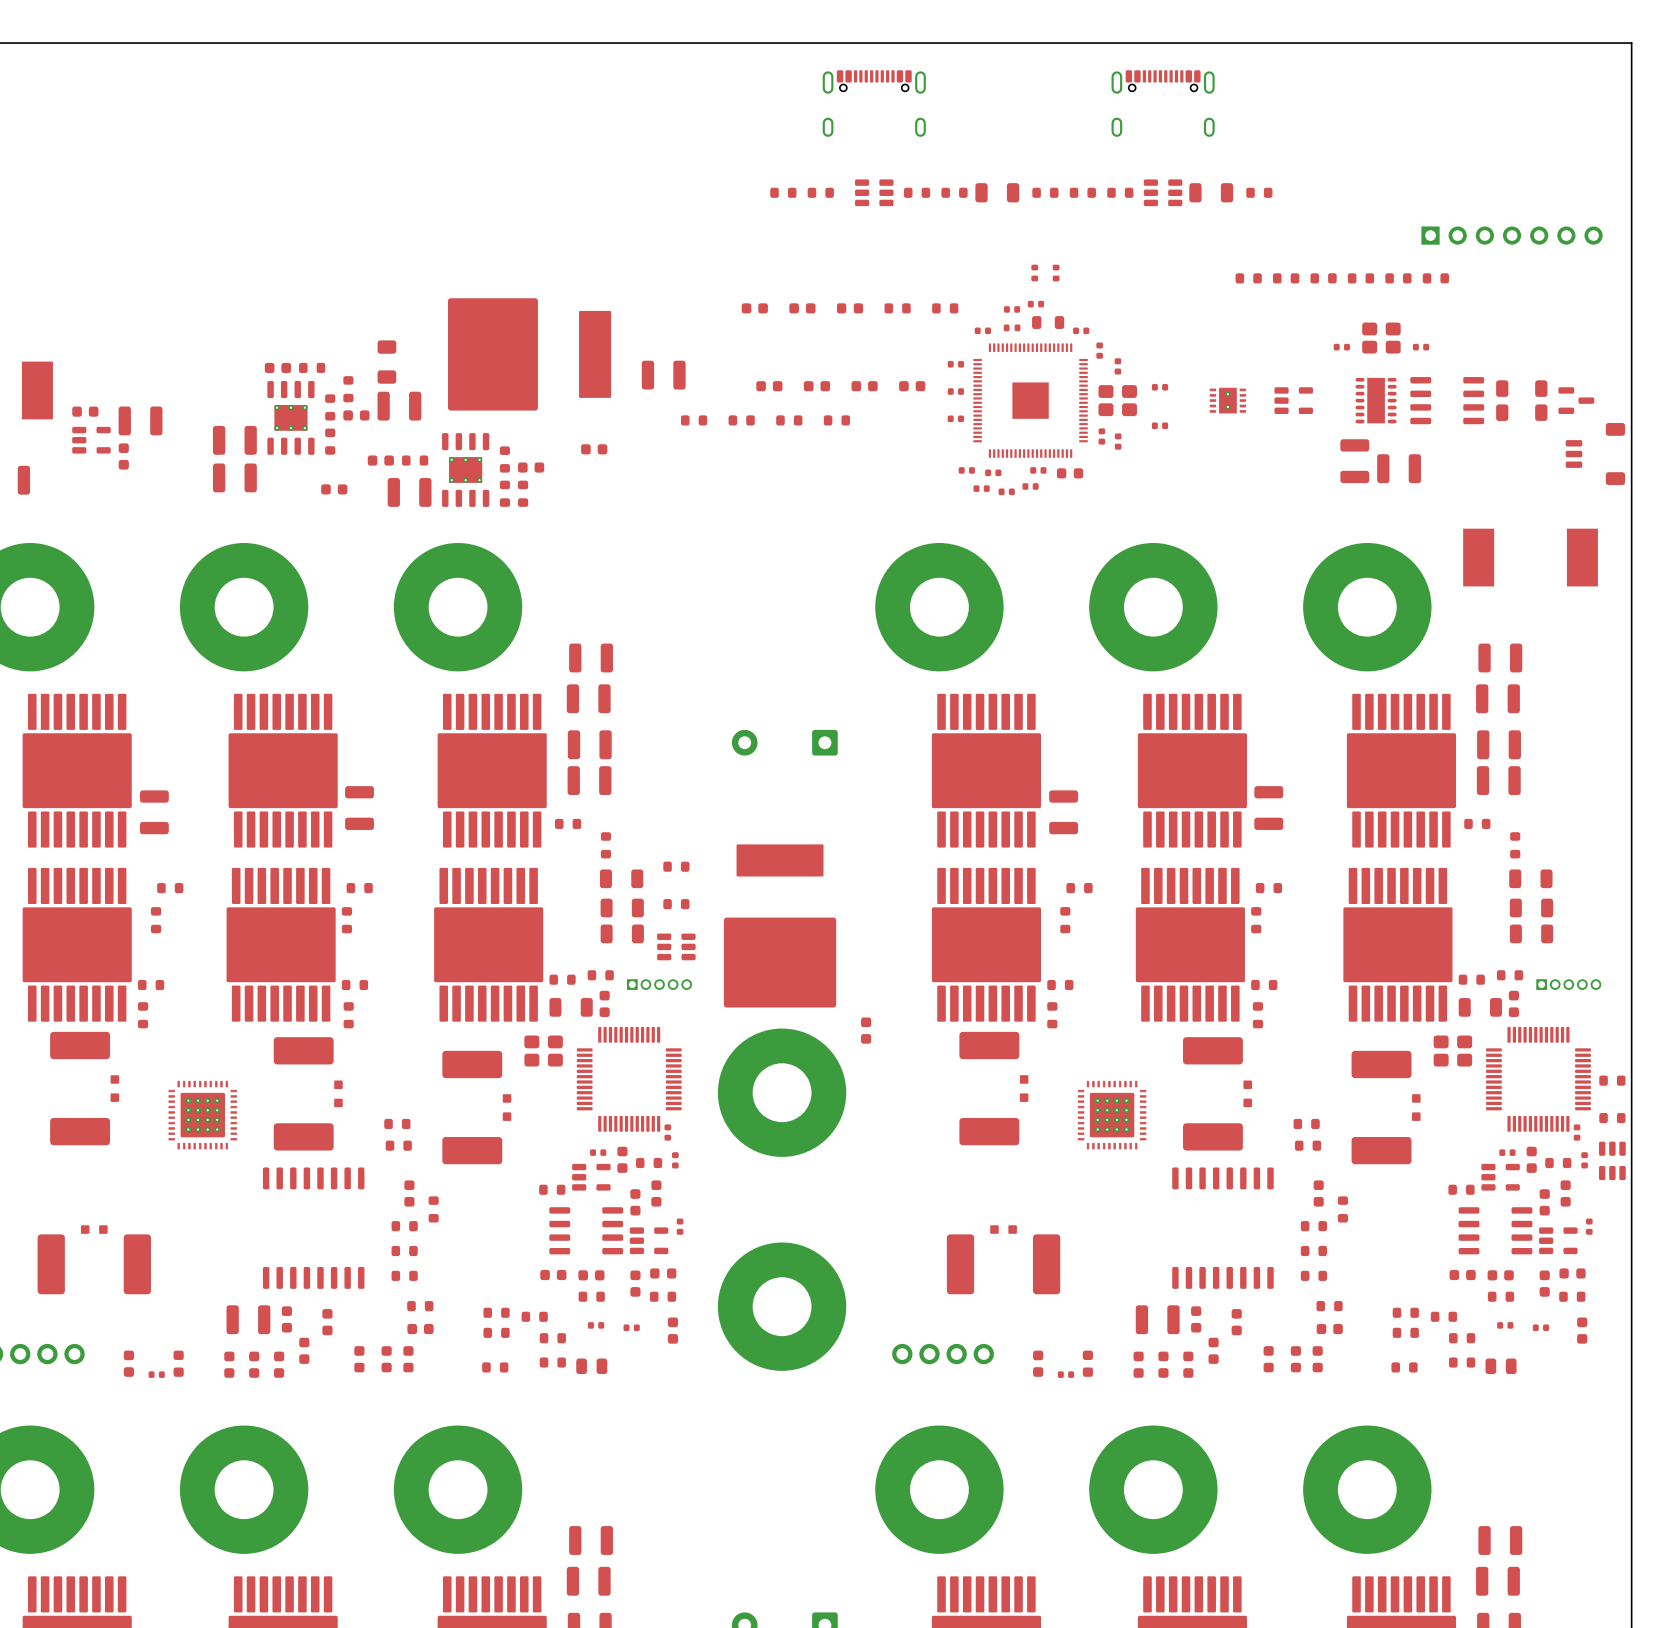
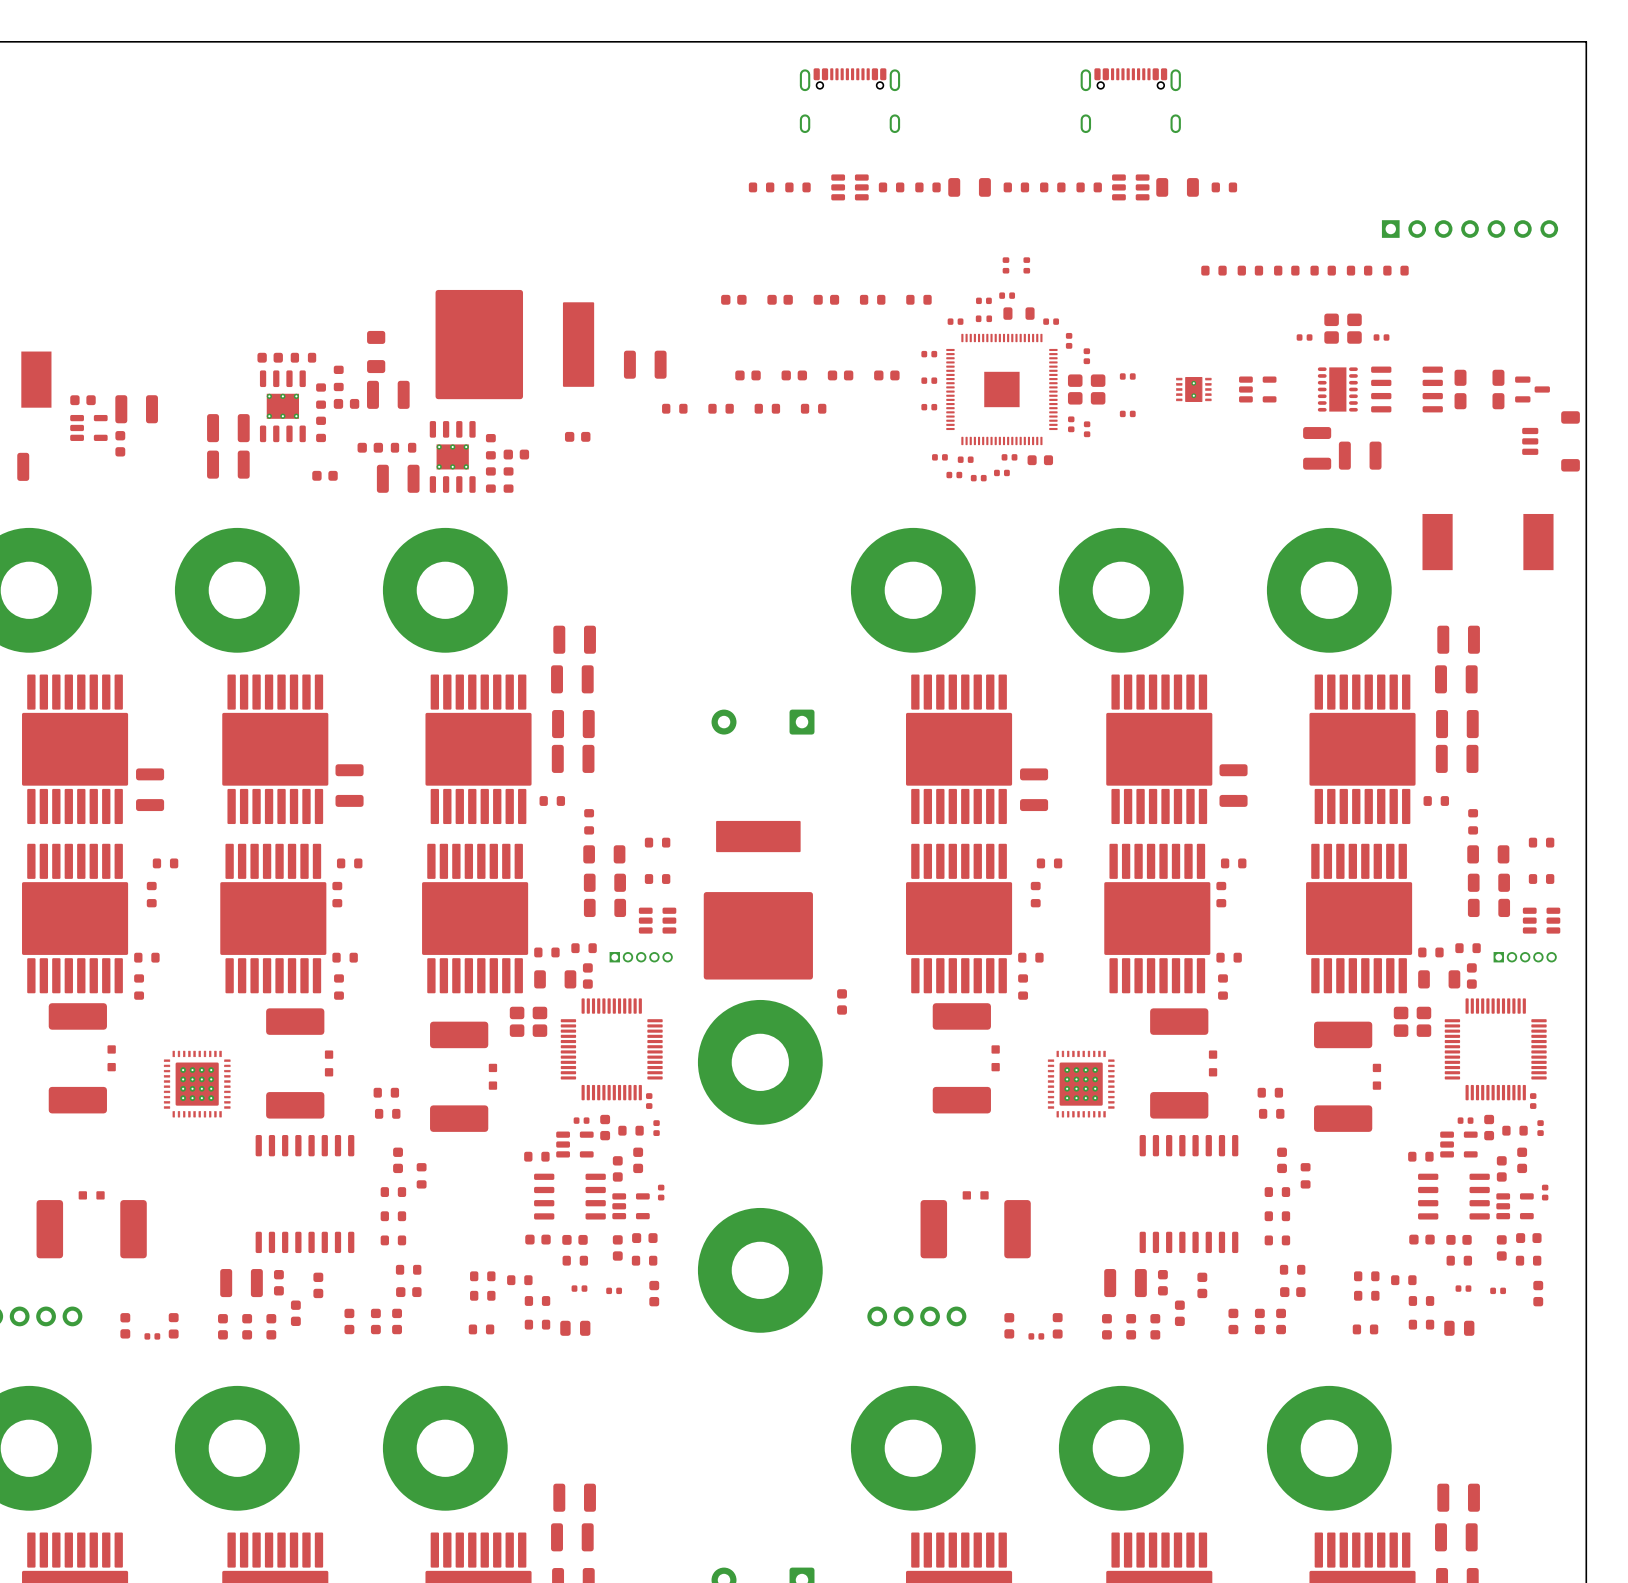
part: none -> (1541, 842)
part: none -> (1541, 879)
part: (1612, 1080) -> none
part: (1612, 1118) -> none
part rotation: 0° (1612, 1160) -> 90° clockwise (1541, 920)
part position: (1612, 1160) -> (1541, 920)

